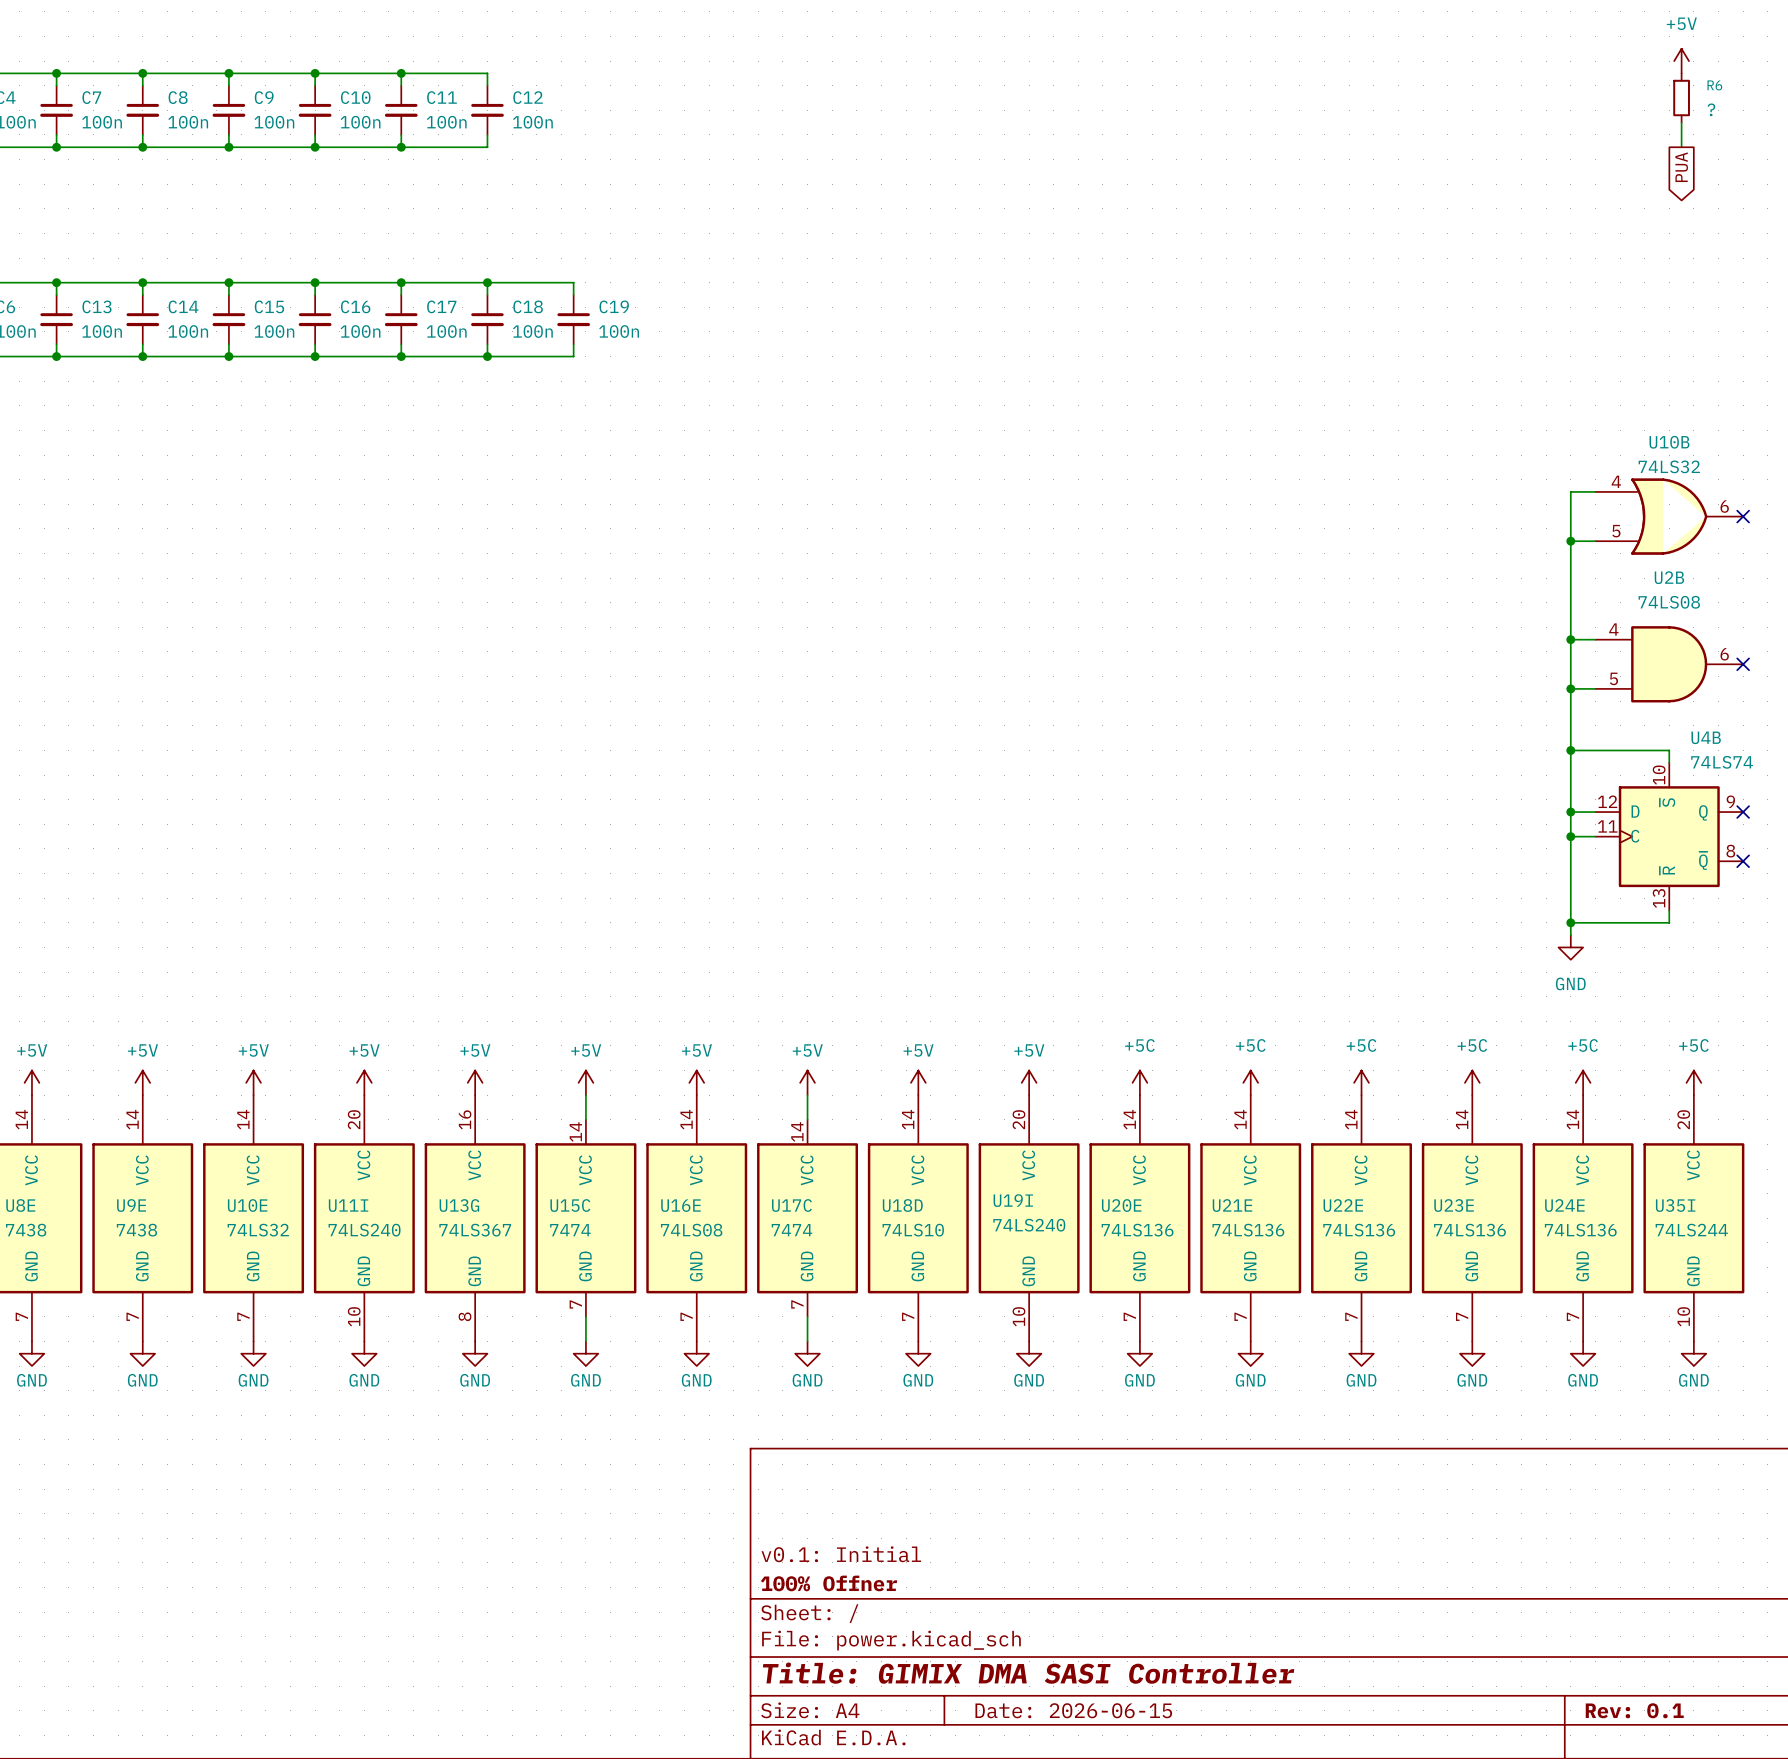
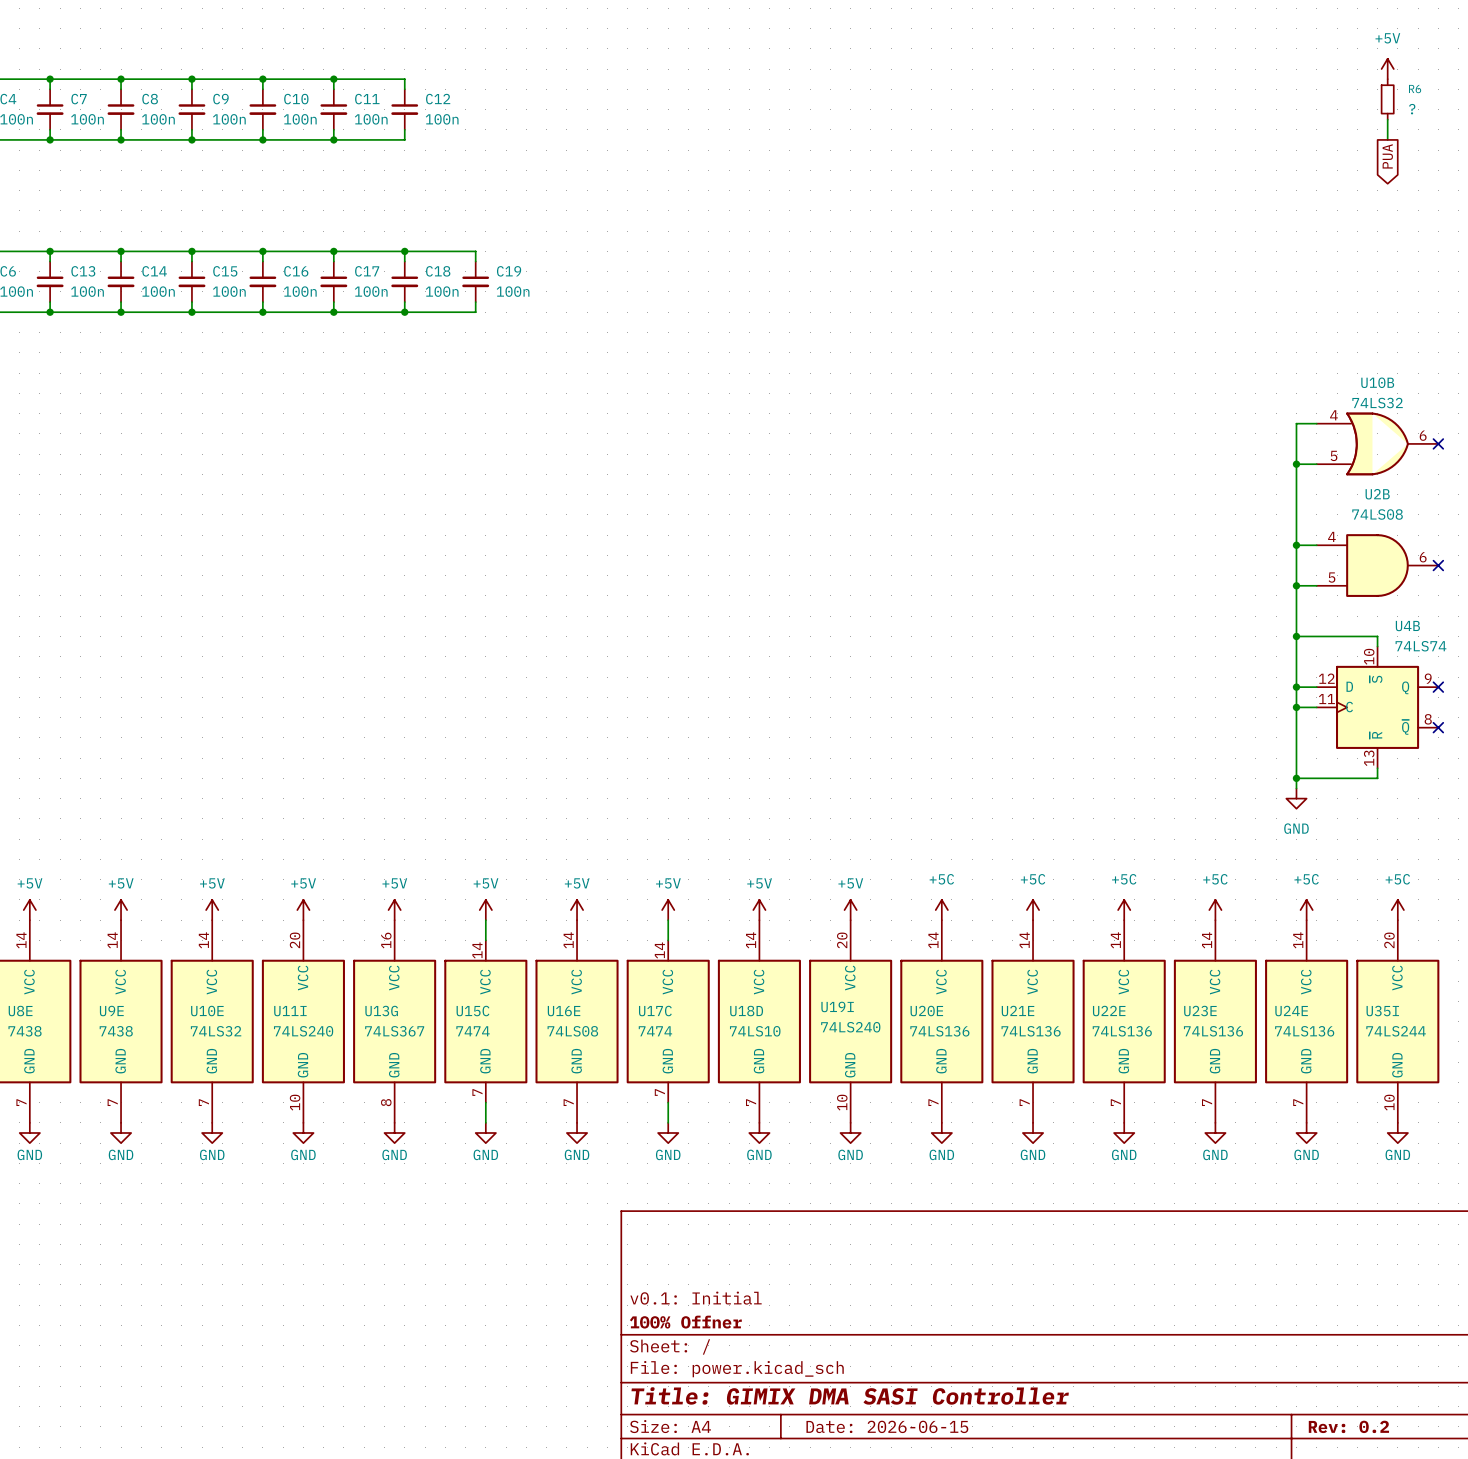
title block: Rev: 0.1 (1634, 1710) -> Rev: 0.2 (1348, 1426)

